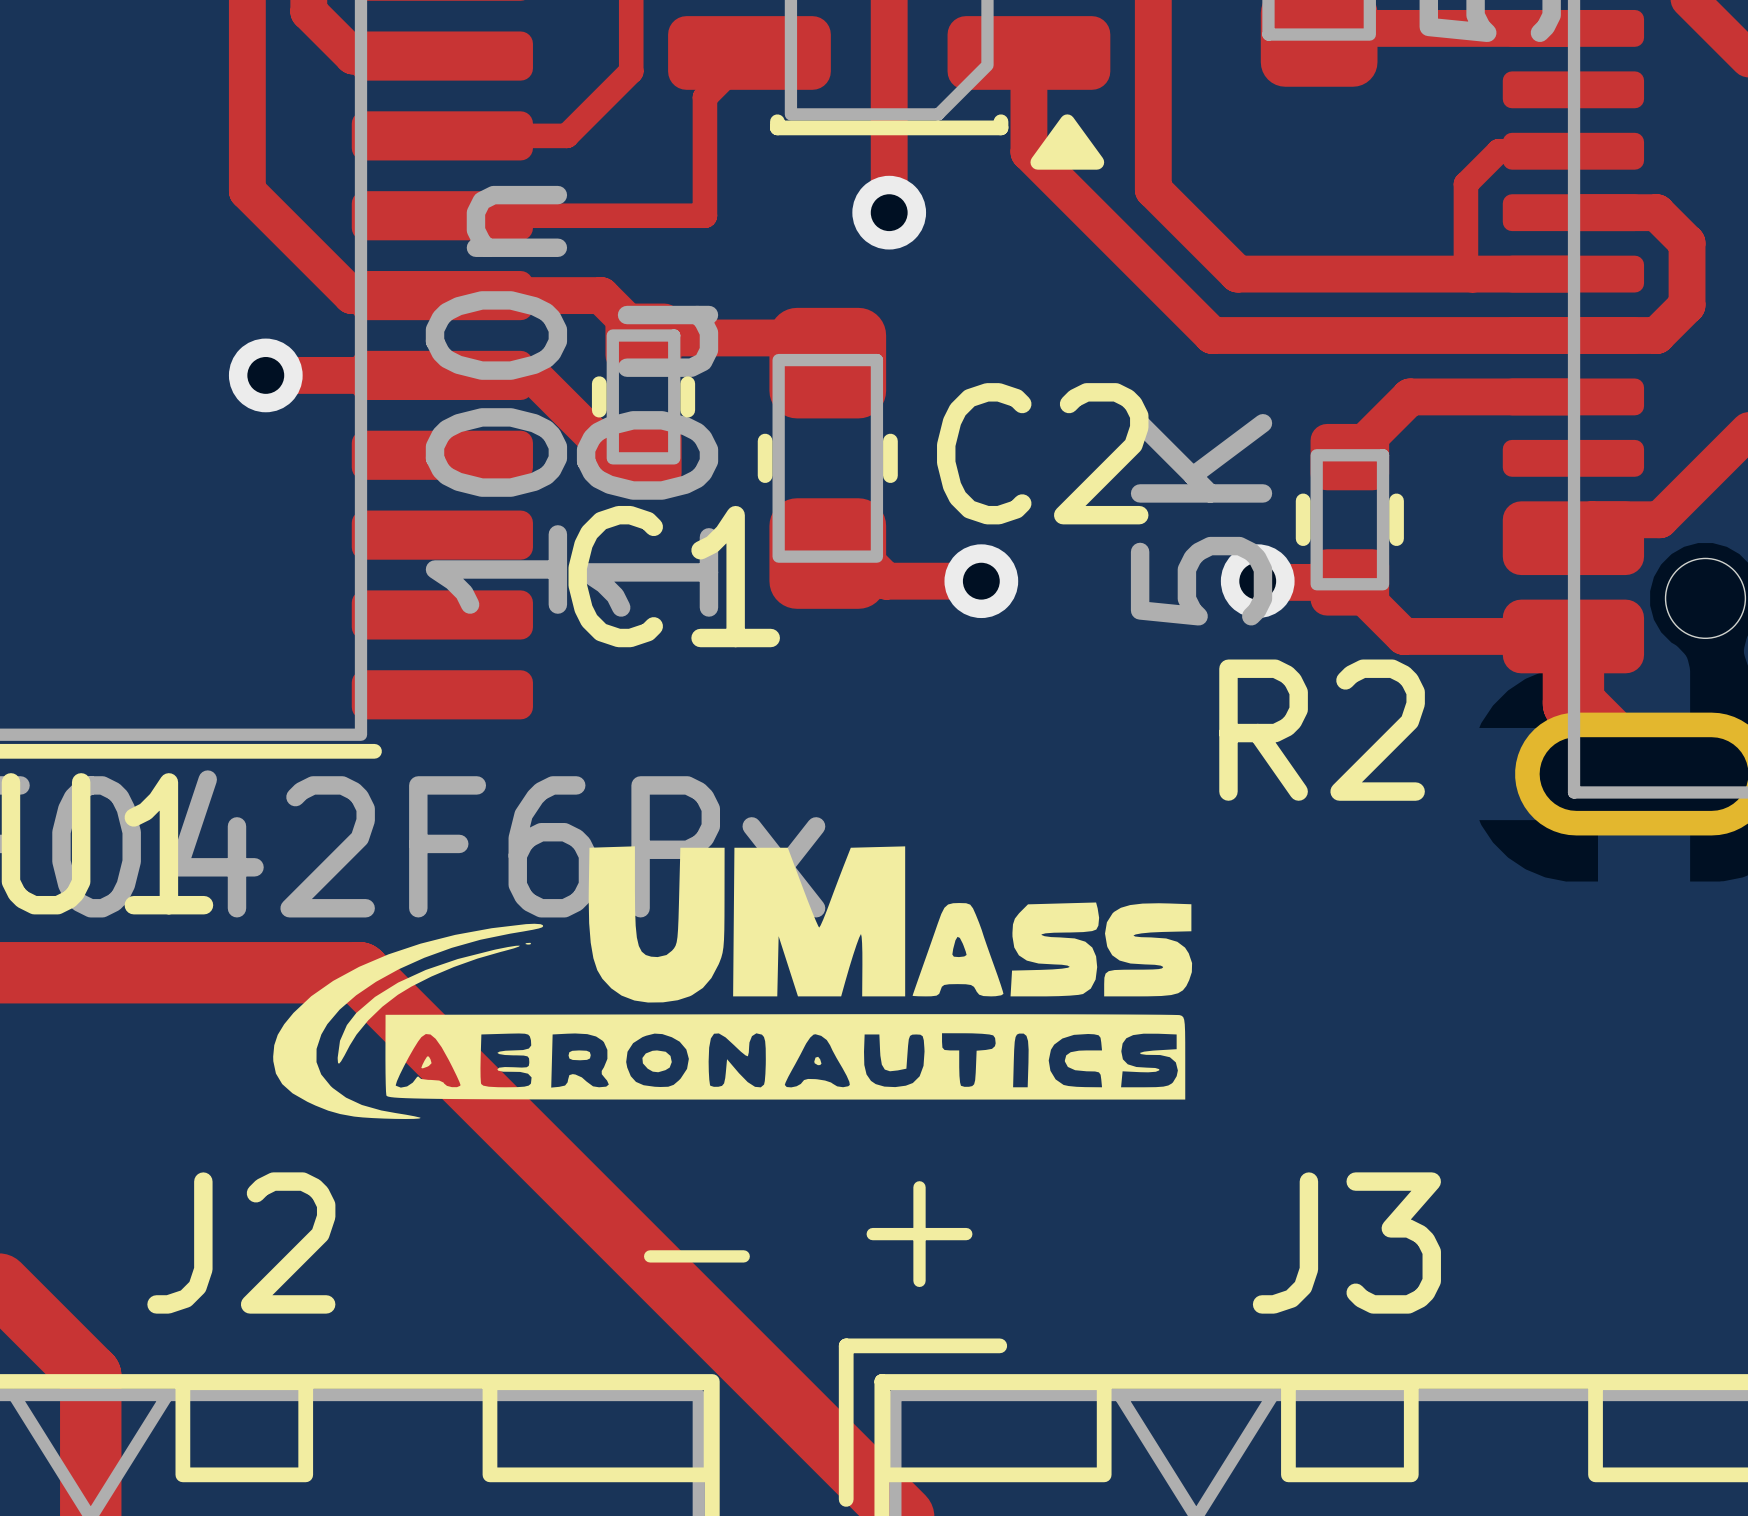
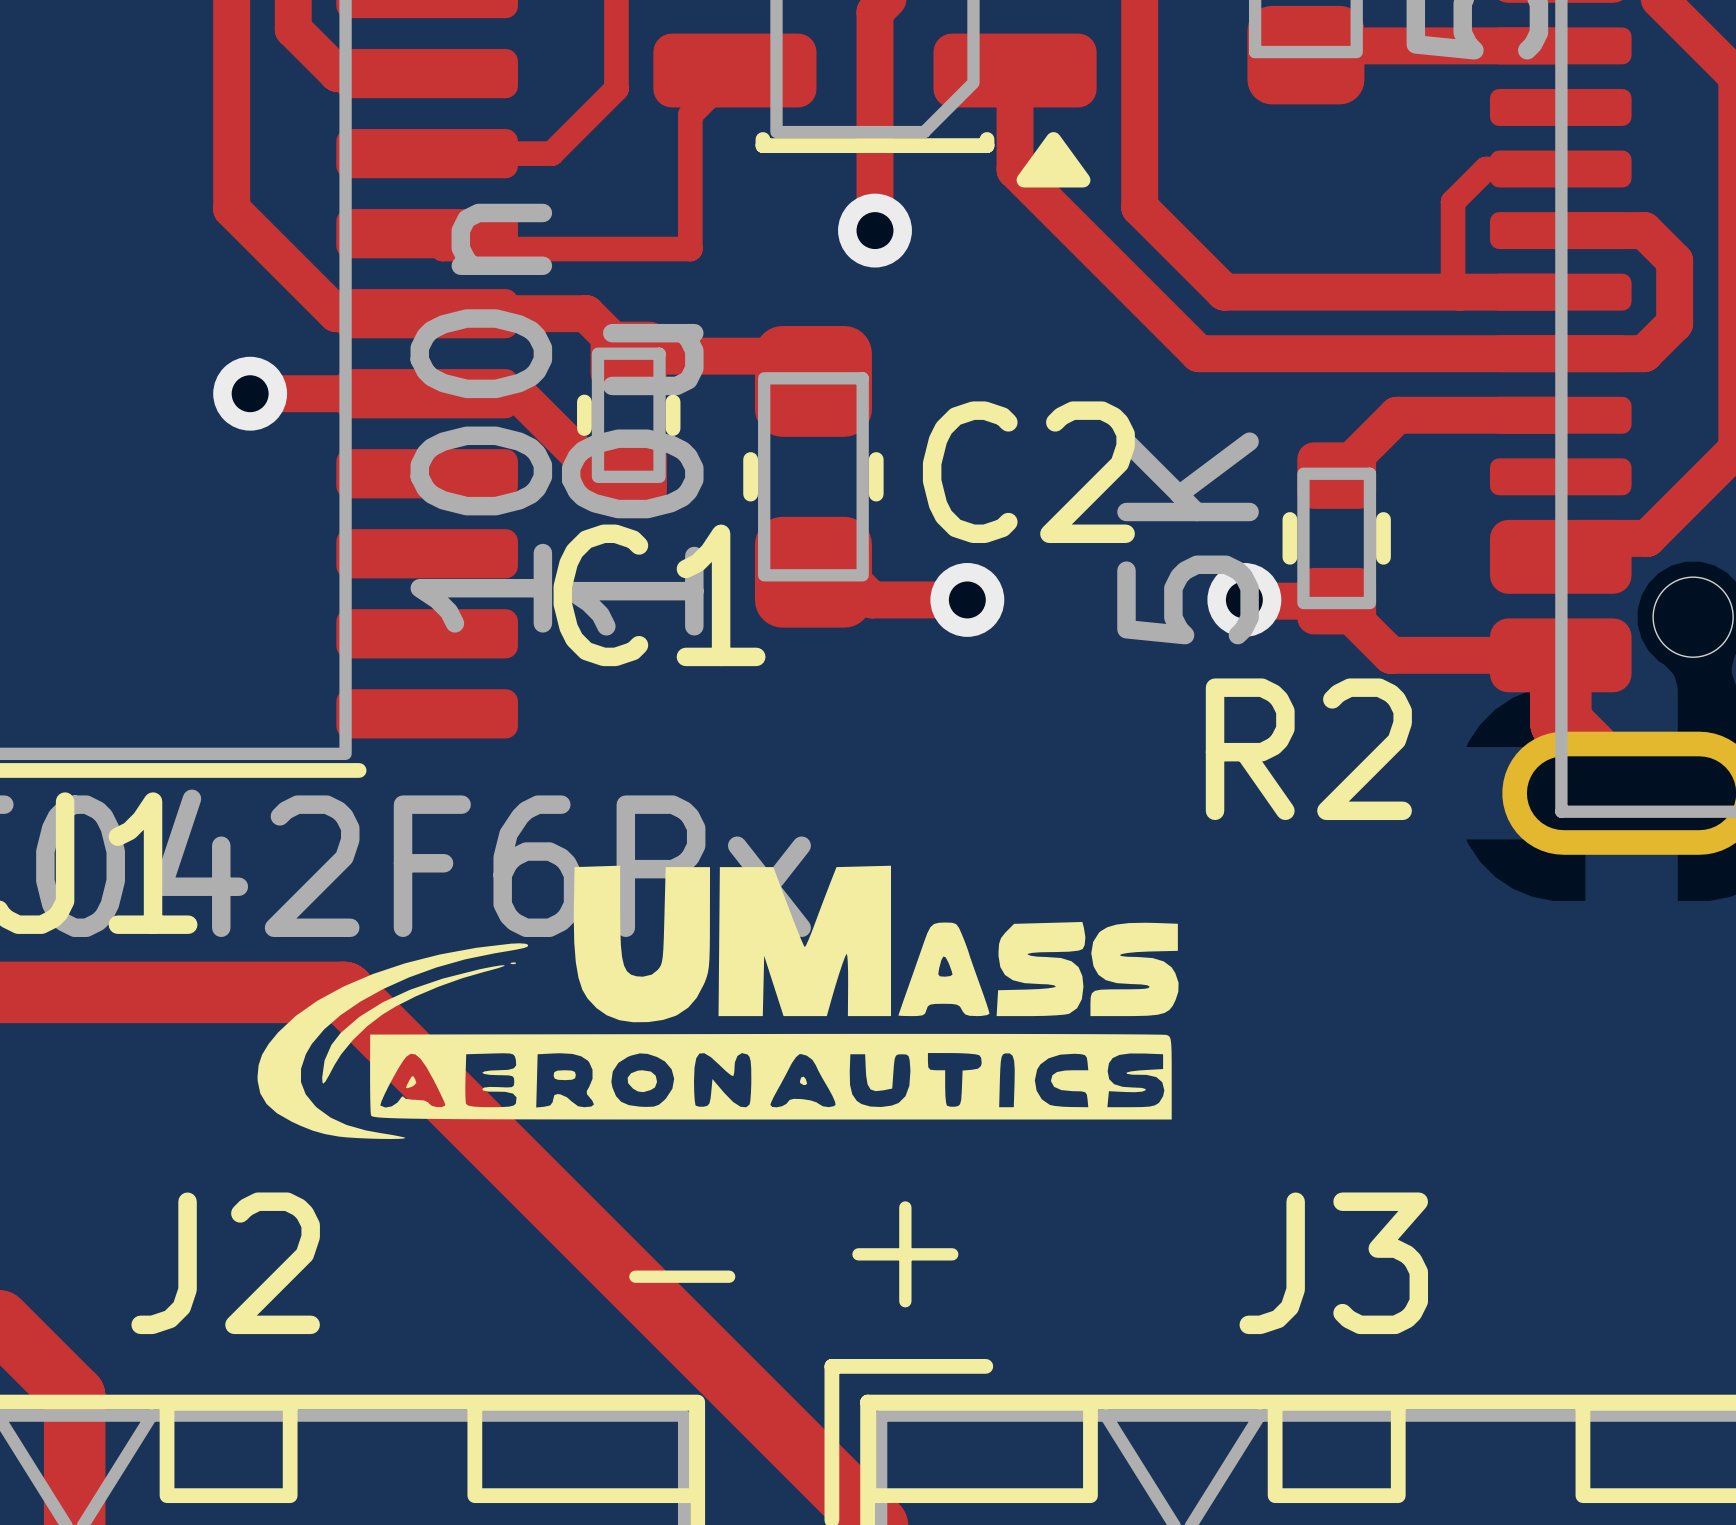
top track: (442, 215) (704, 215) -> (427, 233) (442, 249) (690, 249) (690, 233)

